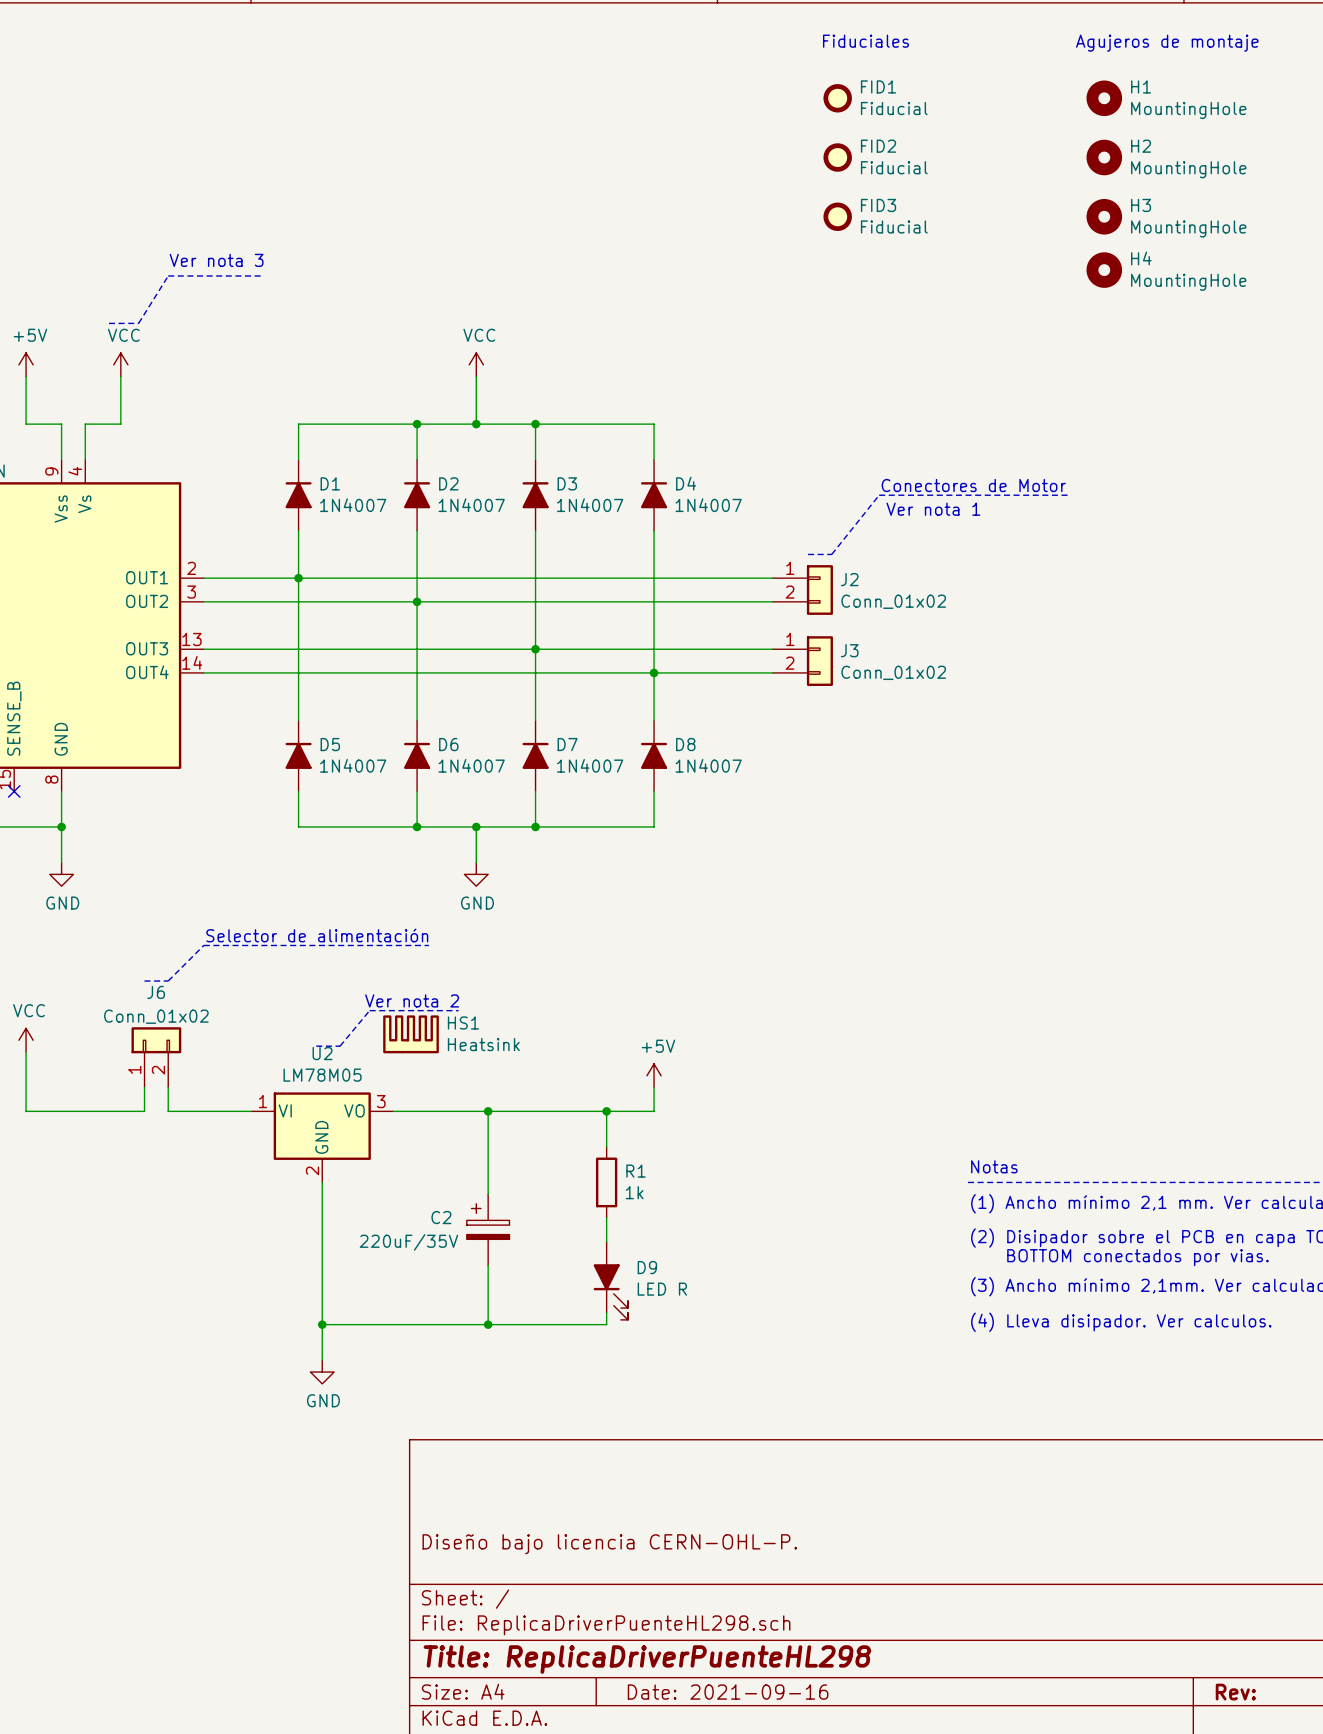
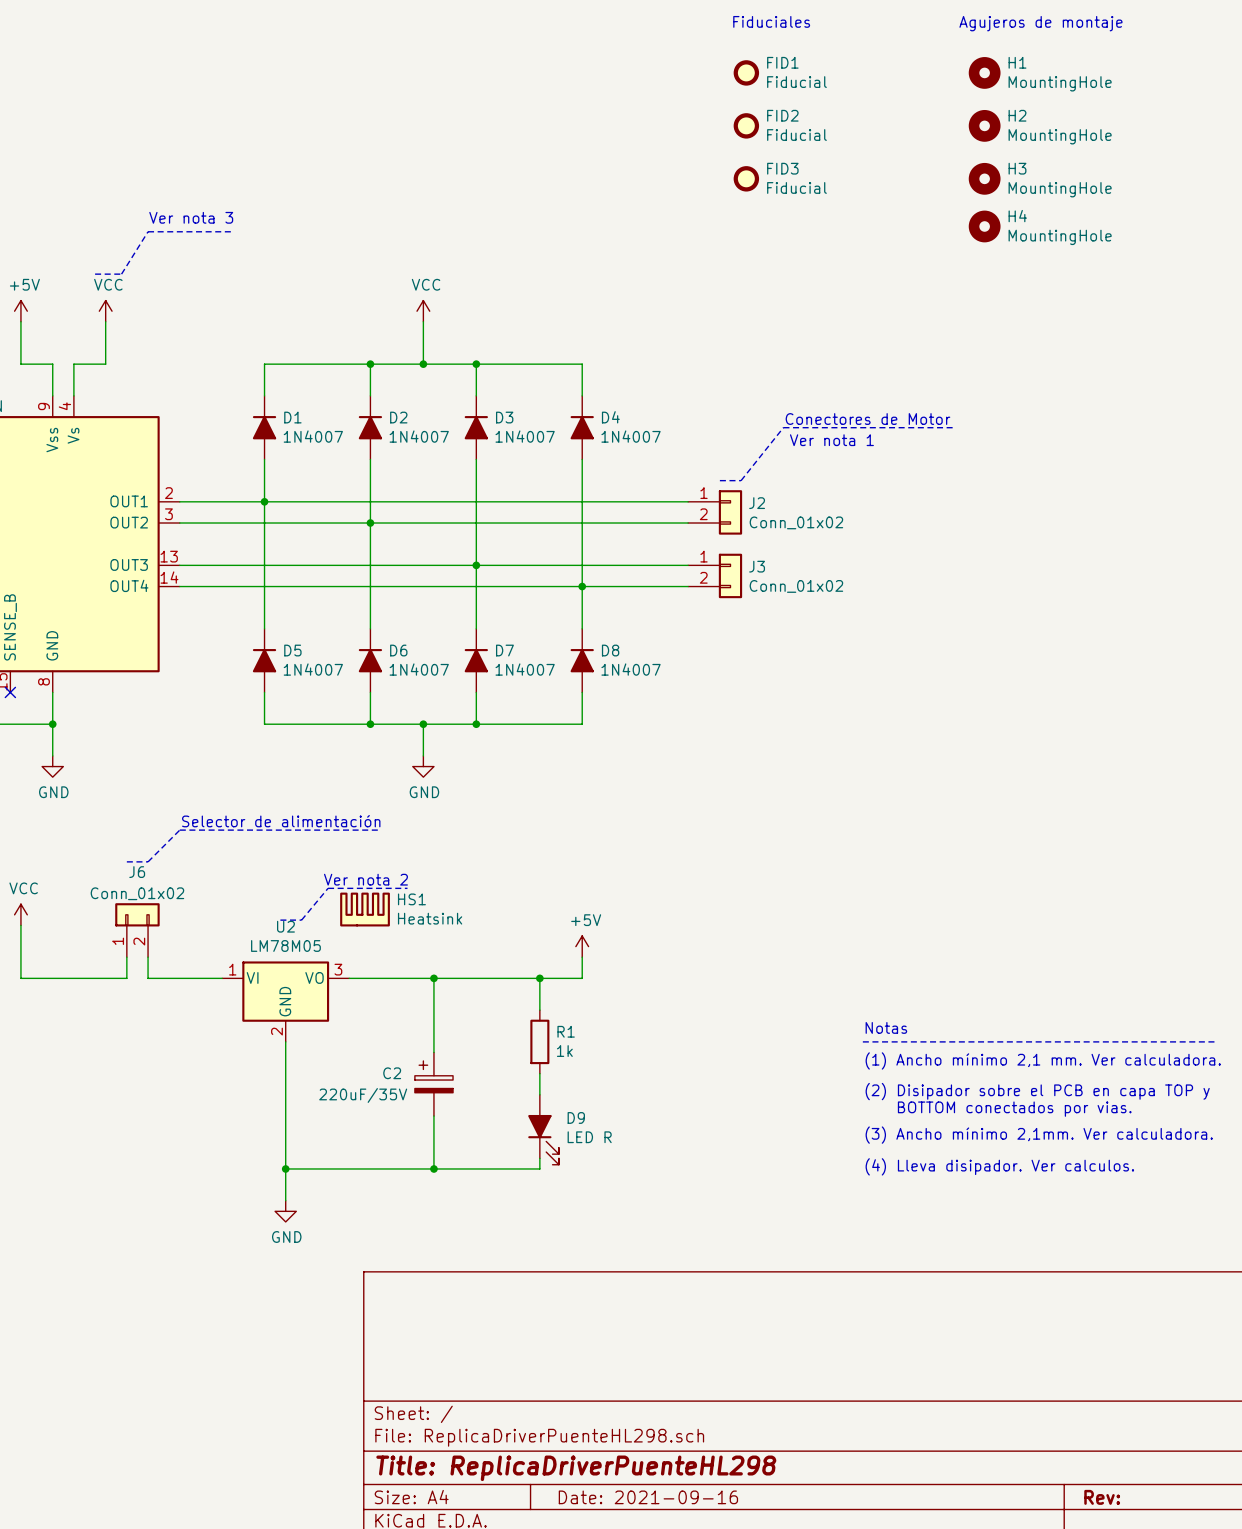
title block: Diseño bajo licencia CERN-OHL-P. (609, 1544) -> none

